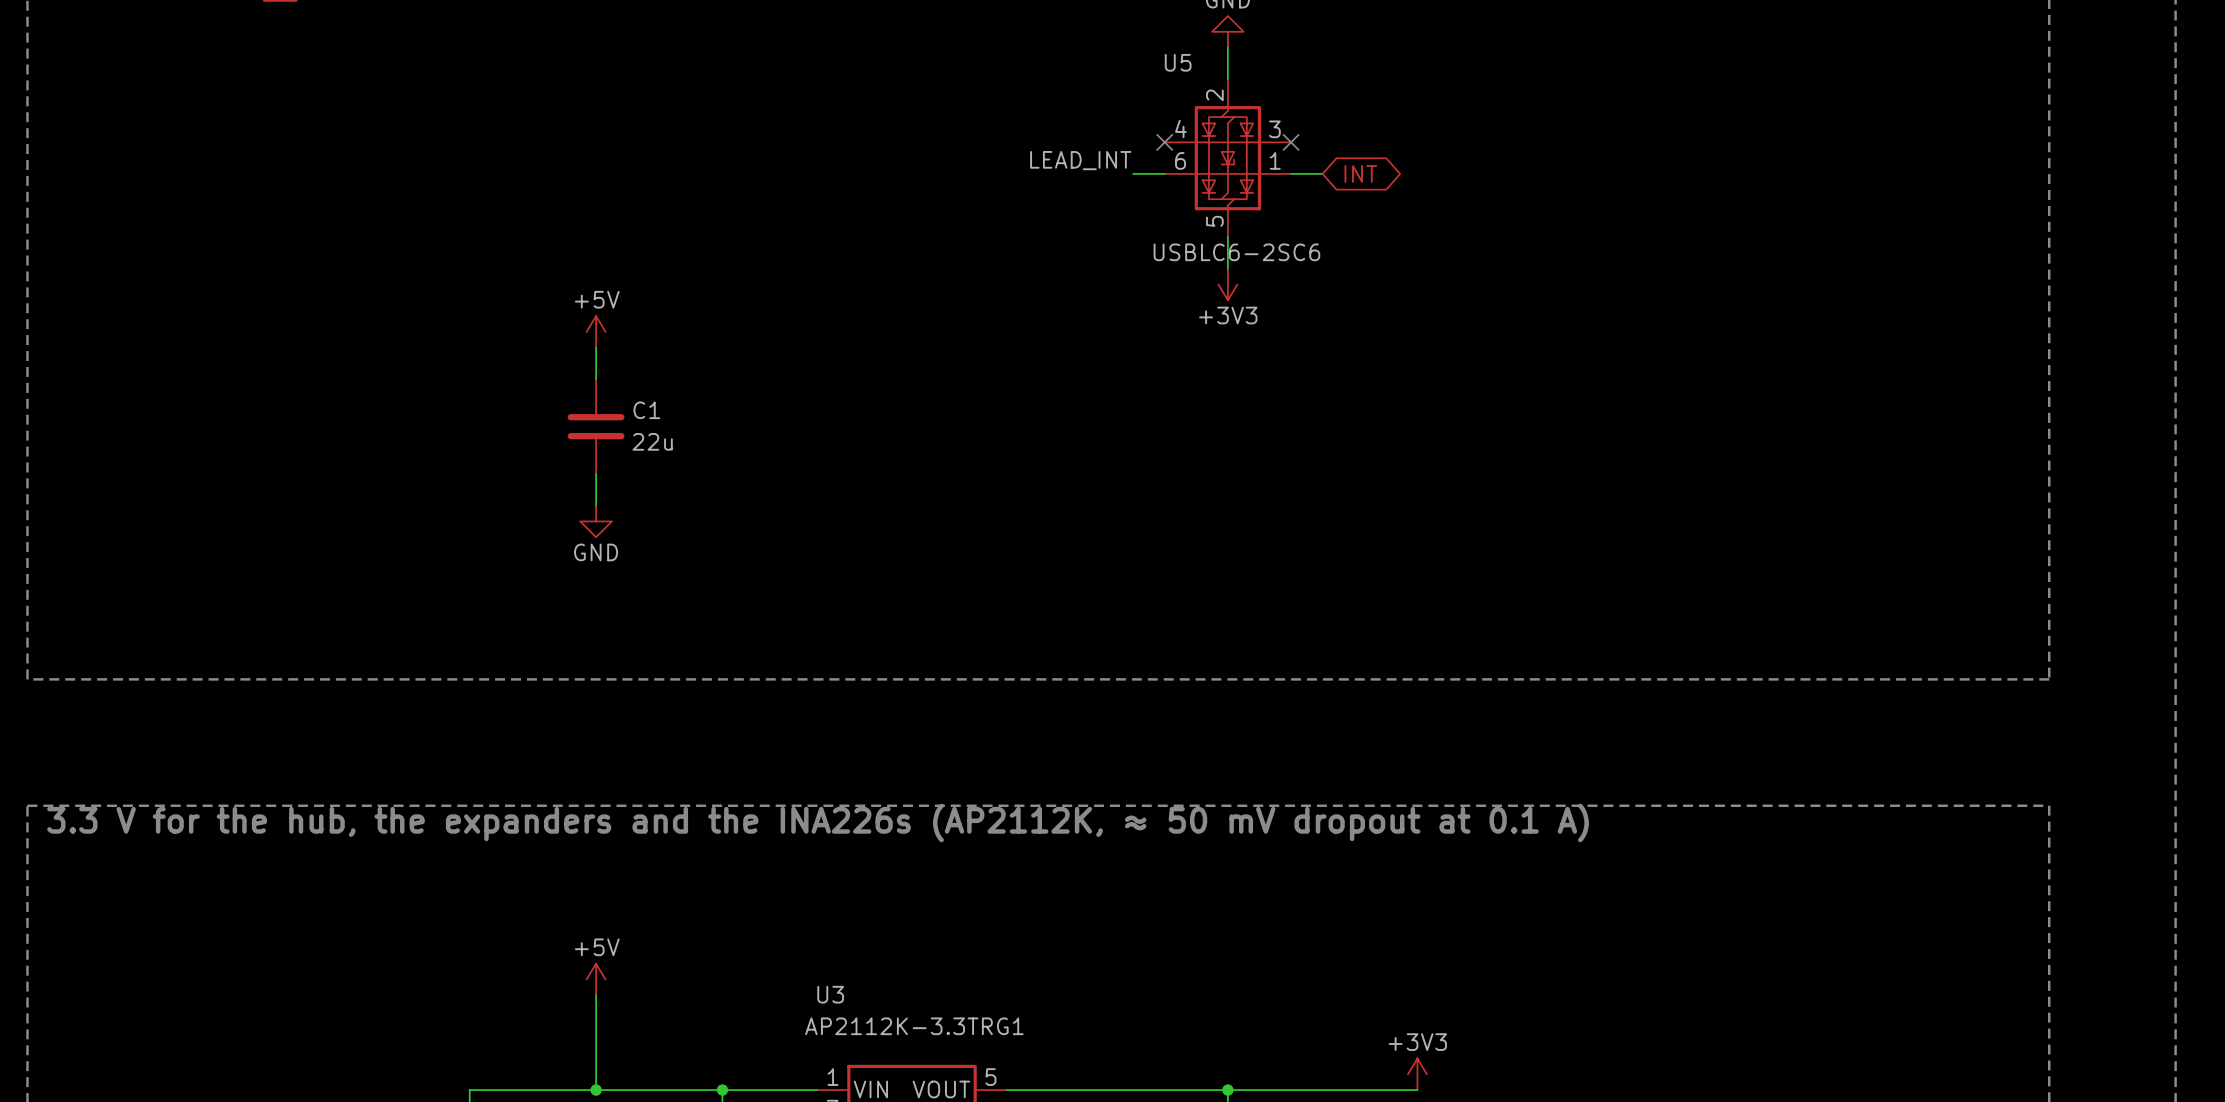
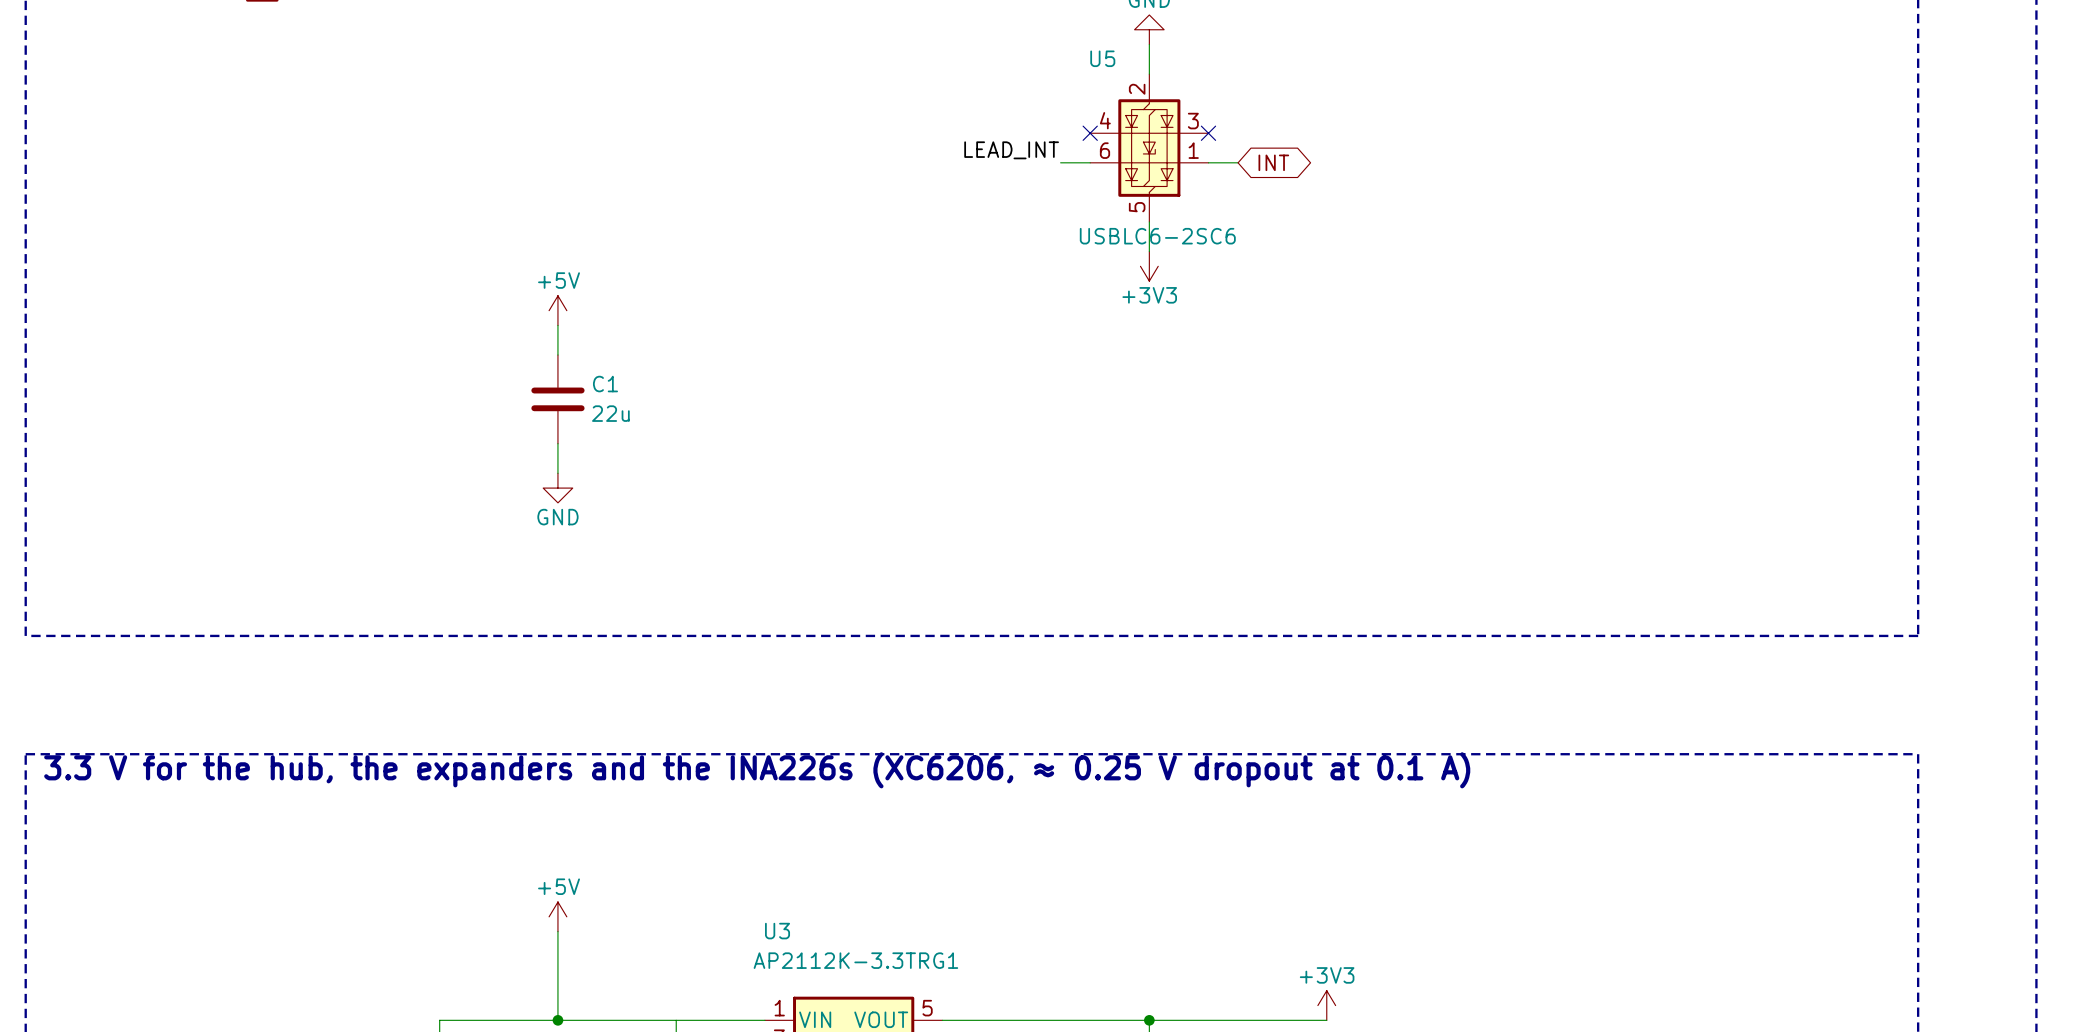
text: 3.3 V for the hub, the expanders and the INA226s (AP2112K, ≈ 50 mV dropout at 0.1 A) (818, 822) -> 3.3 V for the hub, the expanders and the INA226s (XC6206, ≈ 0.25 V dropout at 0.1 A) (757, 770)
junction: (722, 1090) -> none

